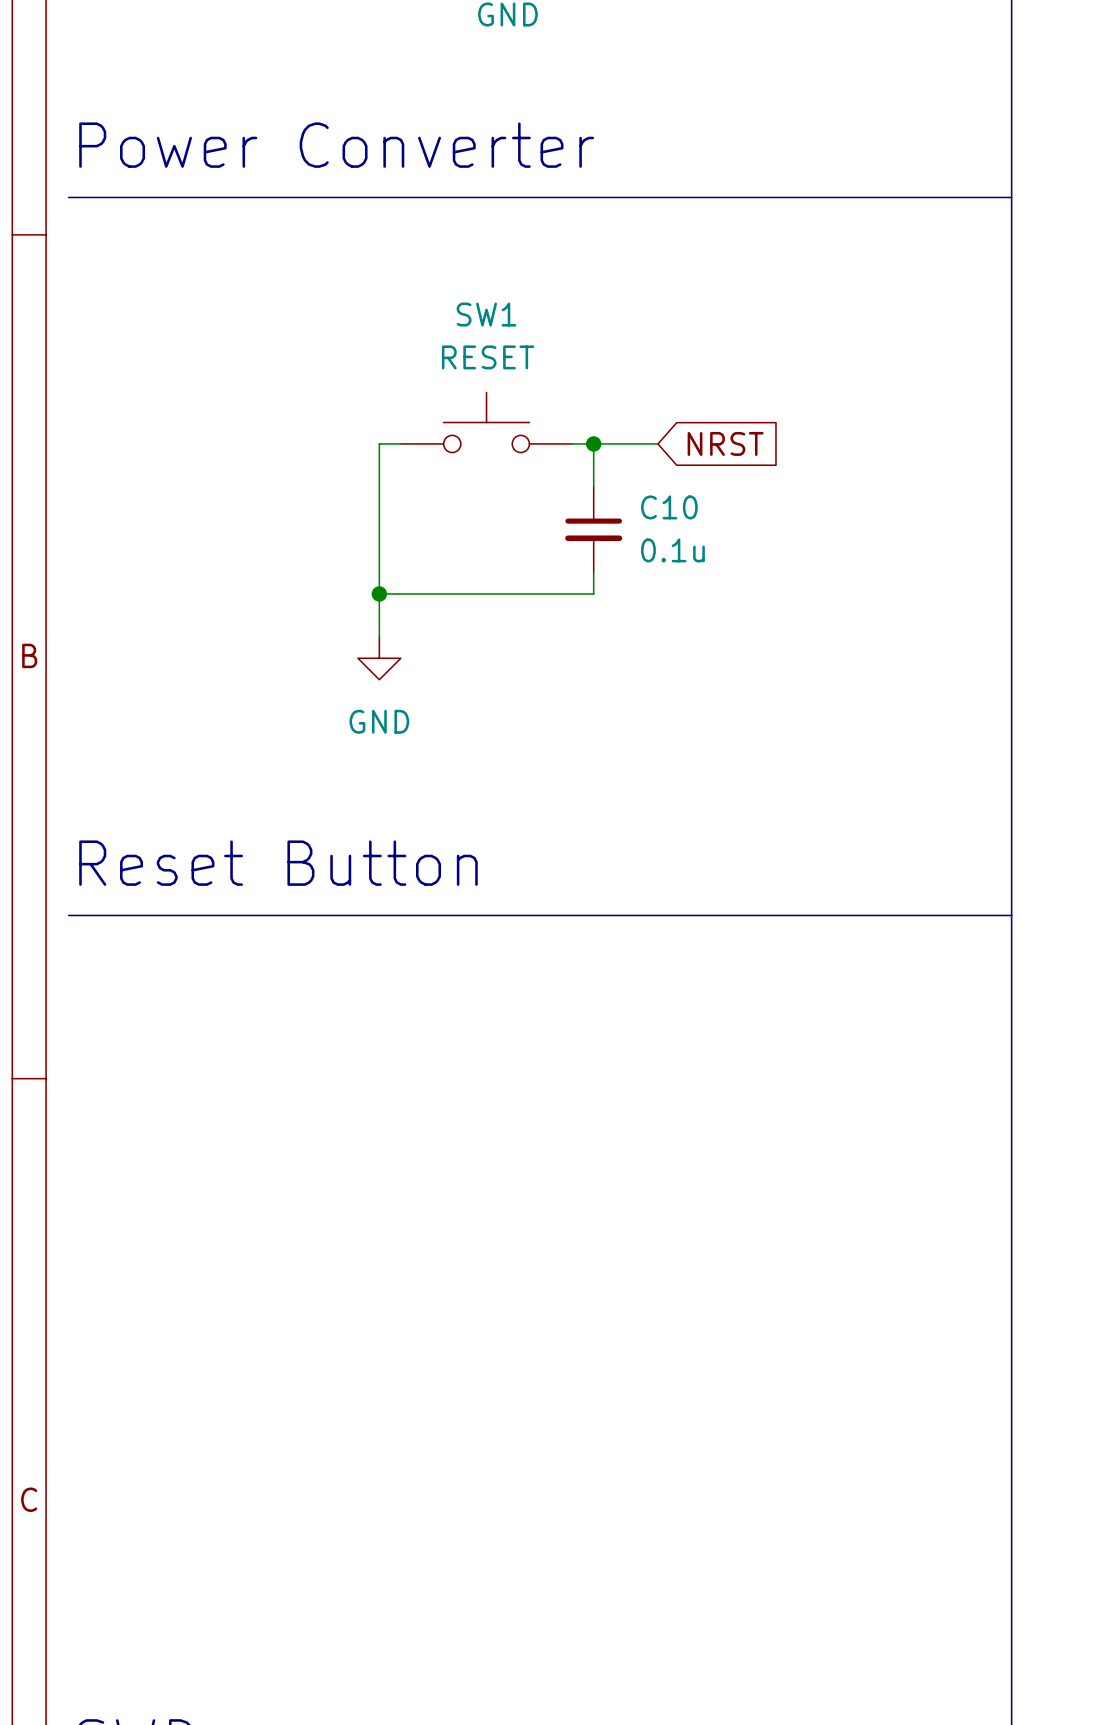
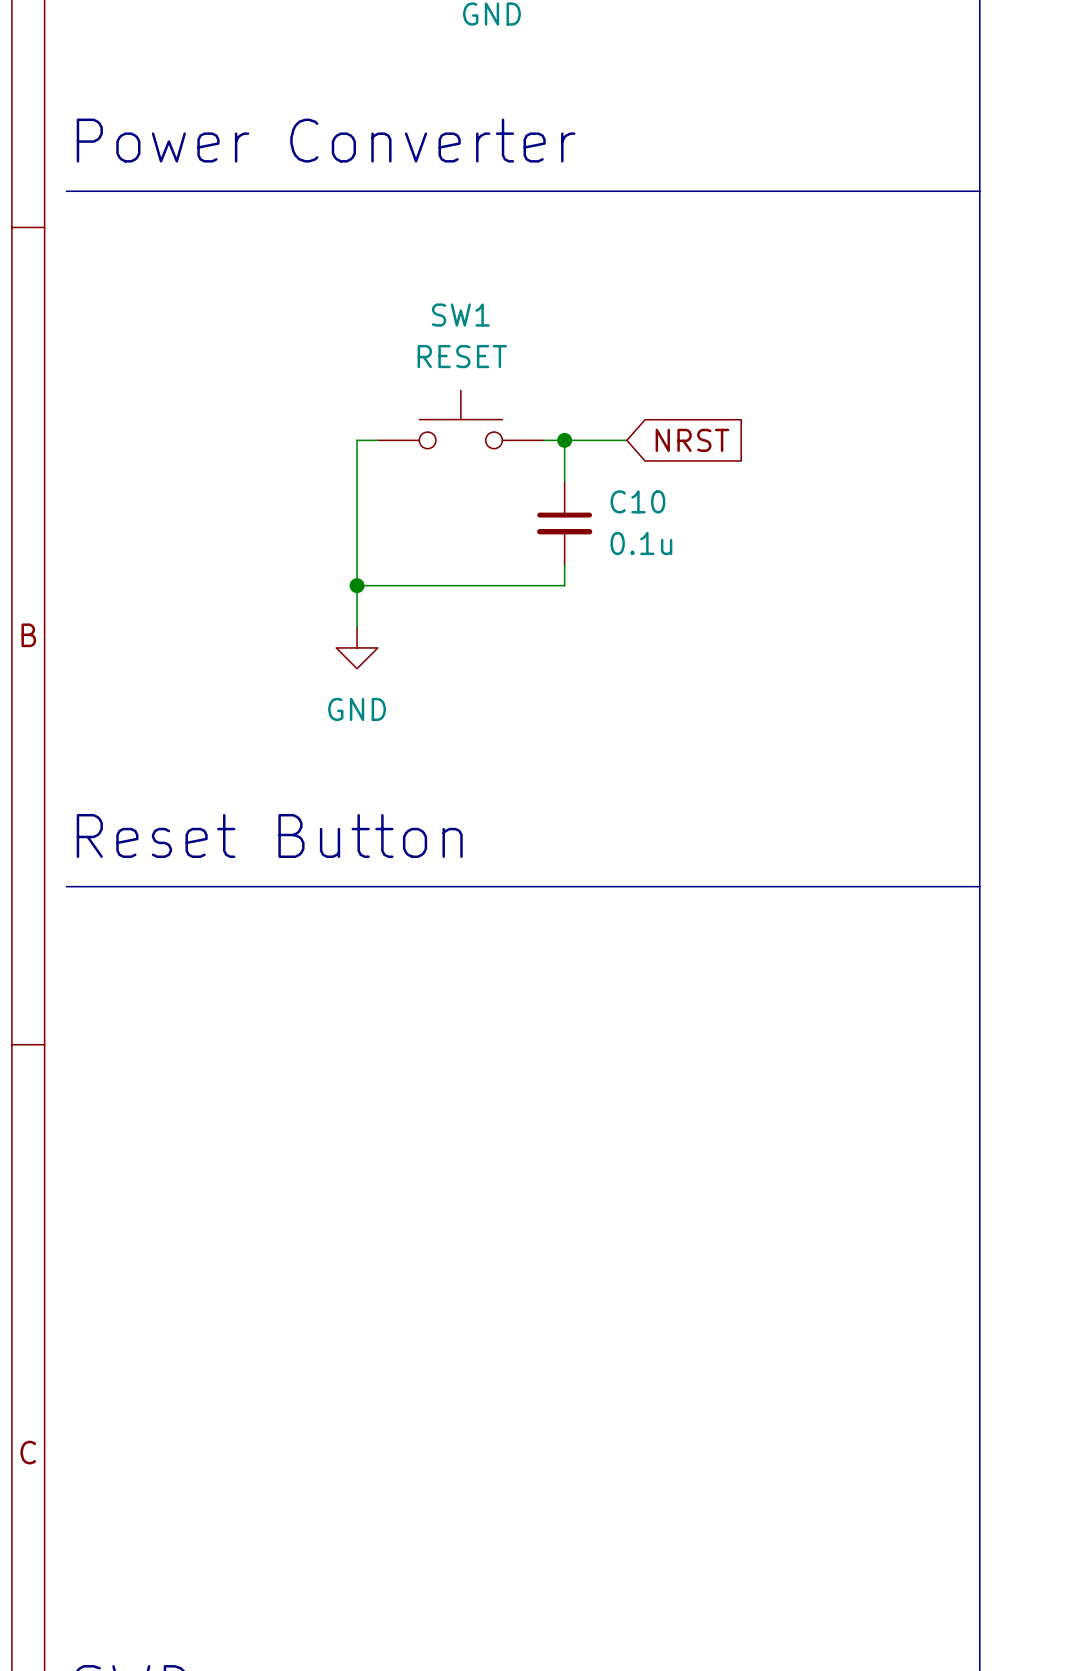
SW1 position: (486, 422) -> (460, 419)
wire: (400, 443) (379, 443) (379, 636) -> (377, 440) (357, 440) (357, 627)
wire: (572, 443) (657, 443) -> (543, 440) (626, 440)
wire: (593, 443) (593, 486) -> (564, 440) (564, 481)
junction position: (593, 443) -> (564, 440)
global label position: NRST (725, 443) -> NRST (692, 440)
C10 position: (593, 529) -> (564, 523)
wire: (593, 572) (593, 593) (379, 593) -> (564, 564) (564, 585) (357, 585)
junction position: (379, 593) -> (357, 585)
power symbol position: GND (379, 658) -> GND (357, 647)

